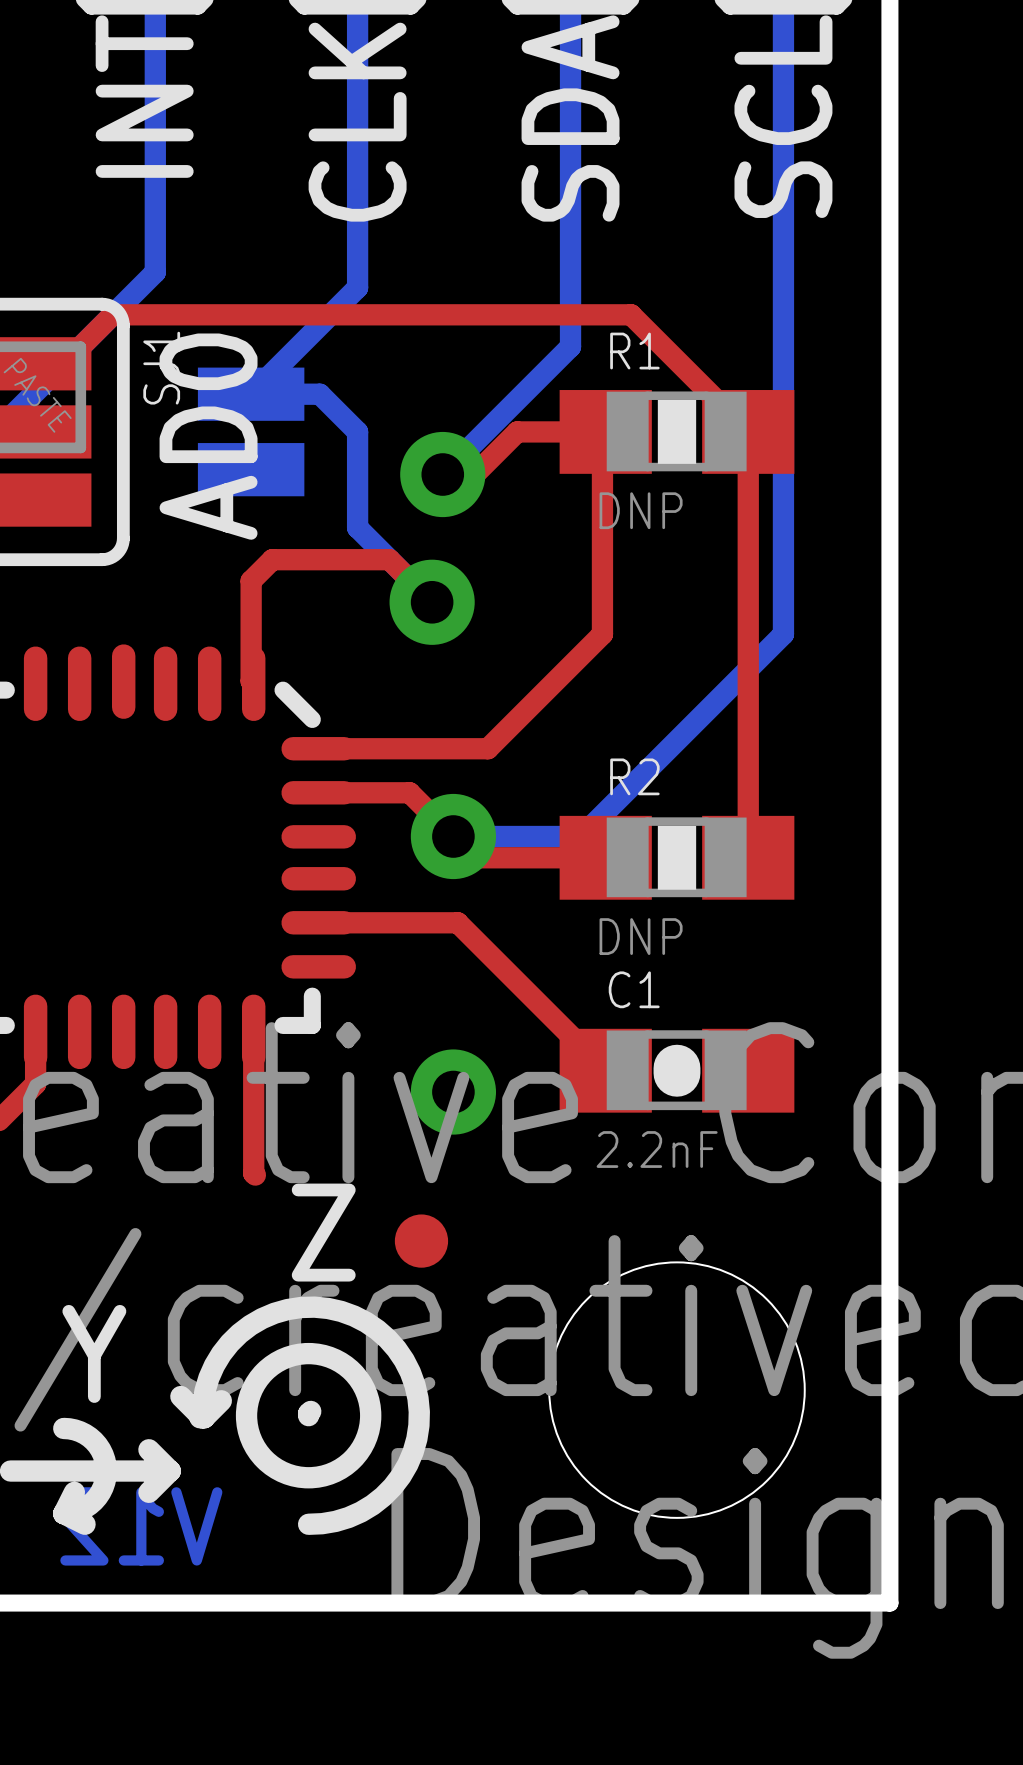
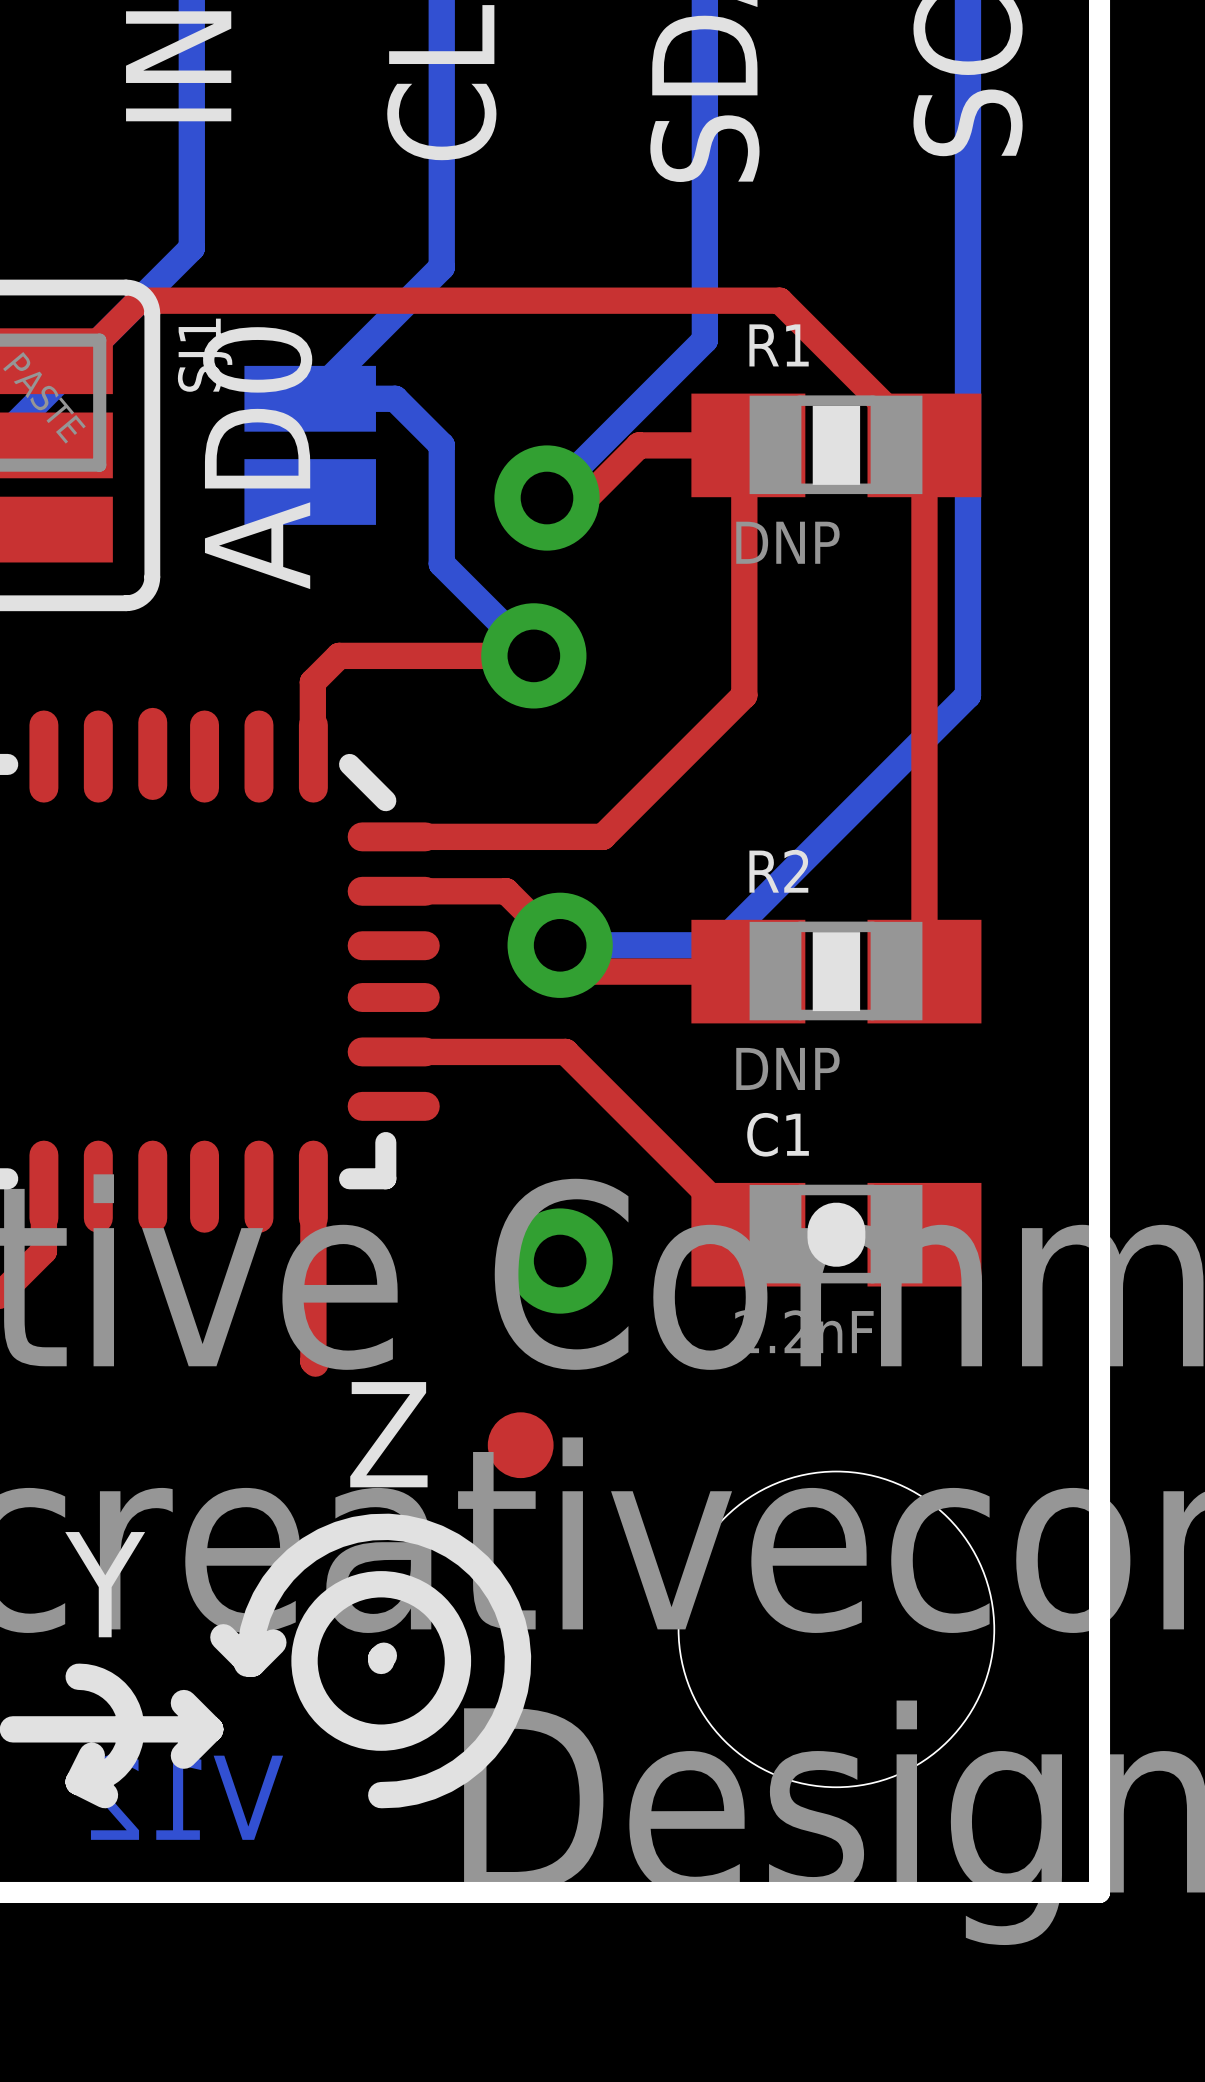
top track: (432, 602) (389, 559) (272, 559) (251, 580) (251, 681) (253, 683) -> (533, 655) (339, 655) (312, 682) (312, 755)

